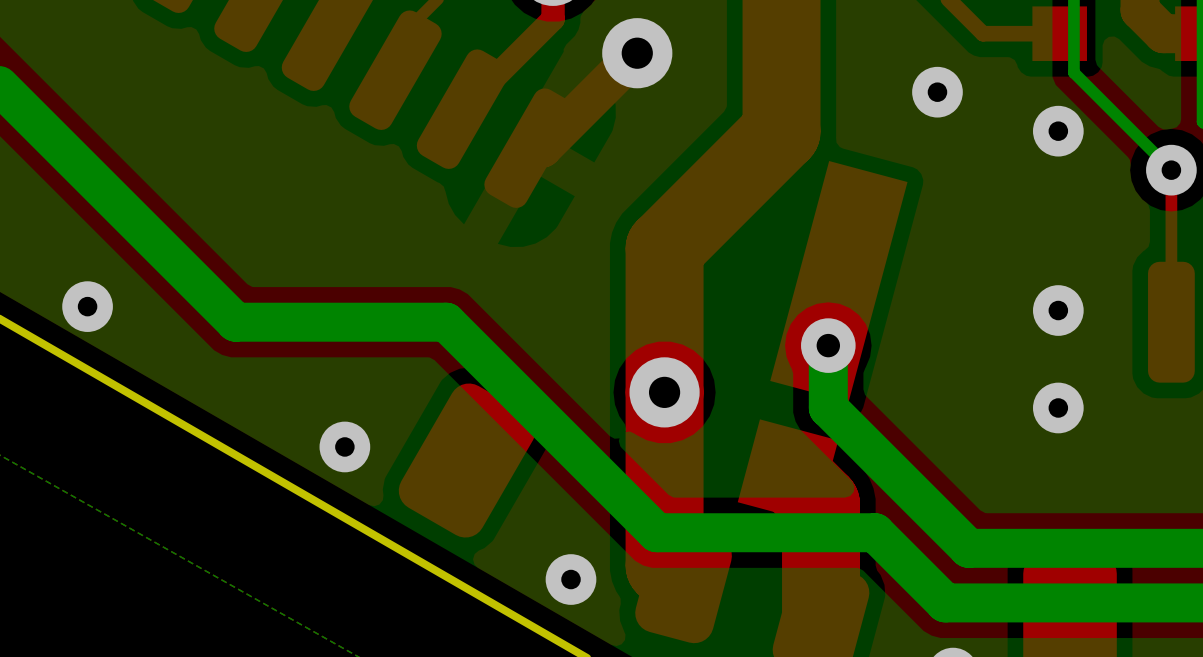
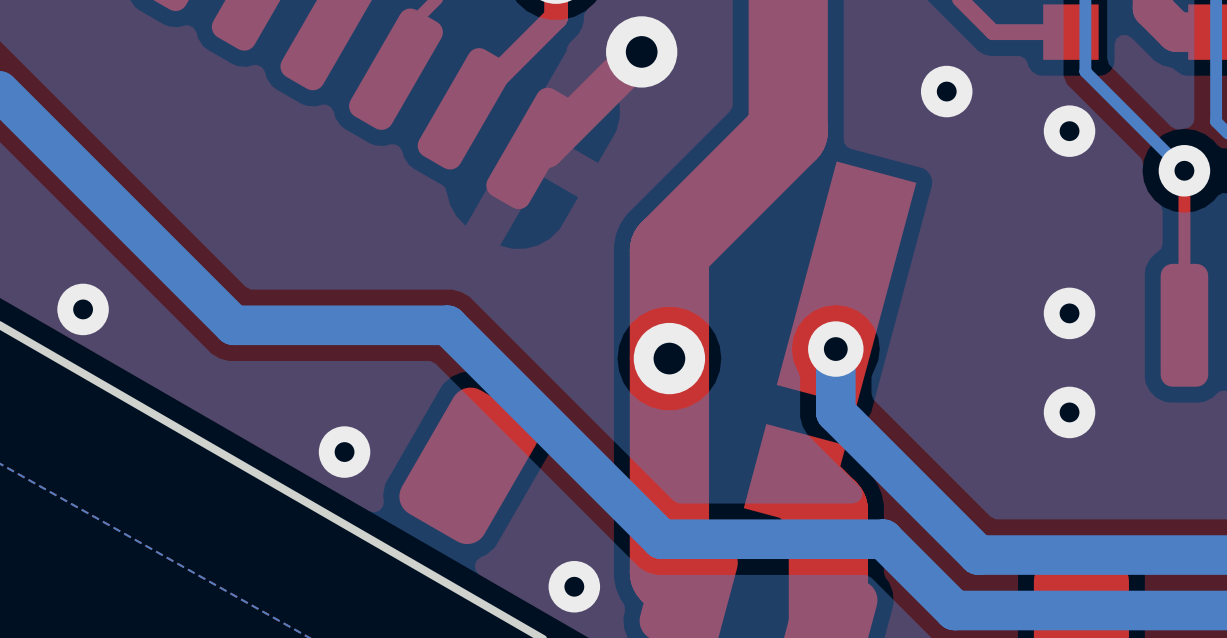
via position: (664, 392) -> (669, 358)

